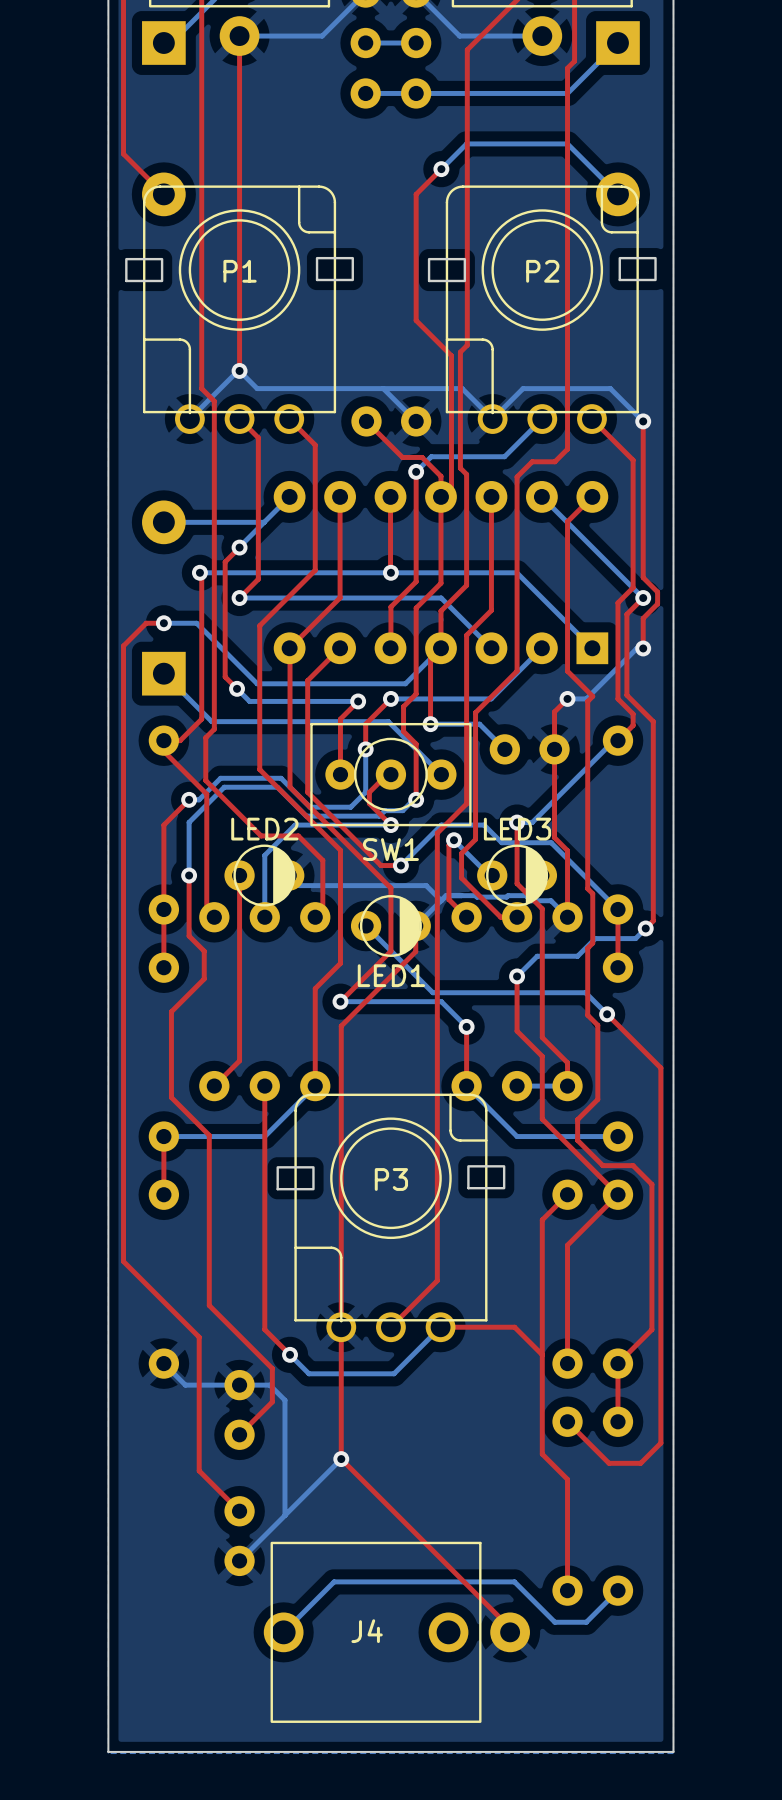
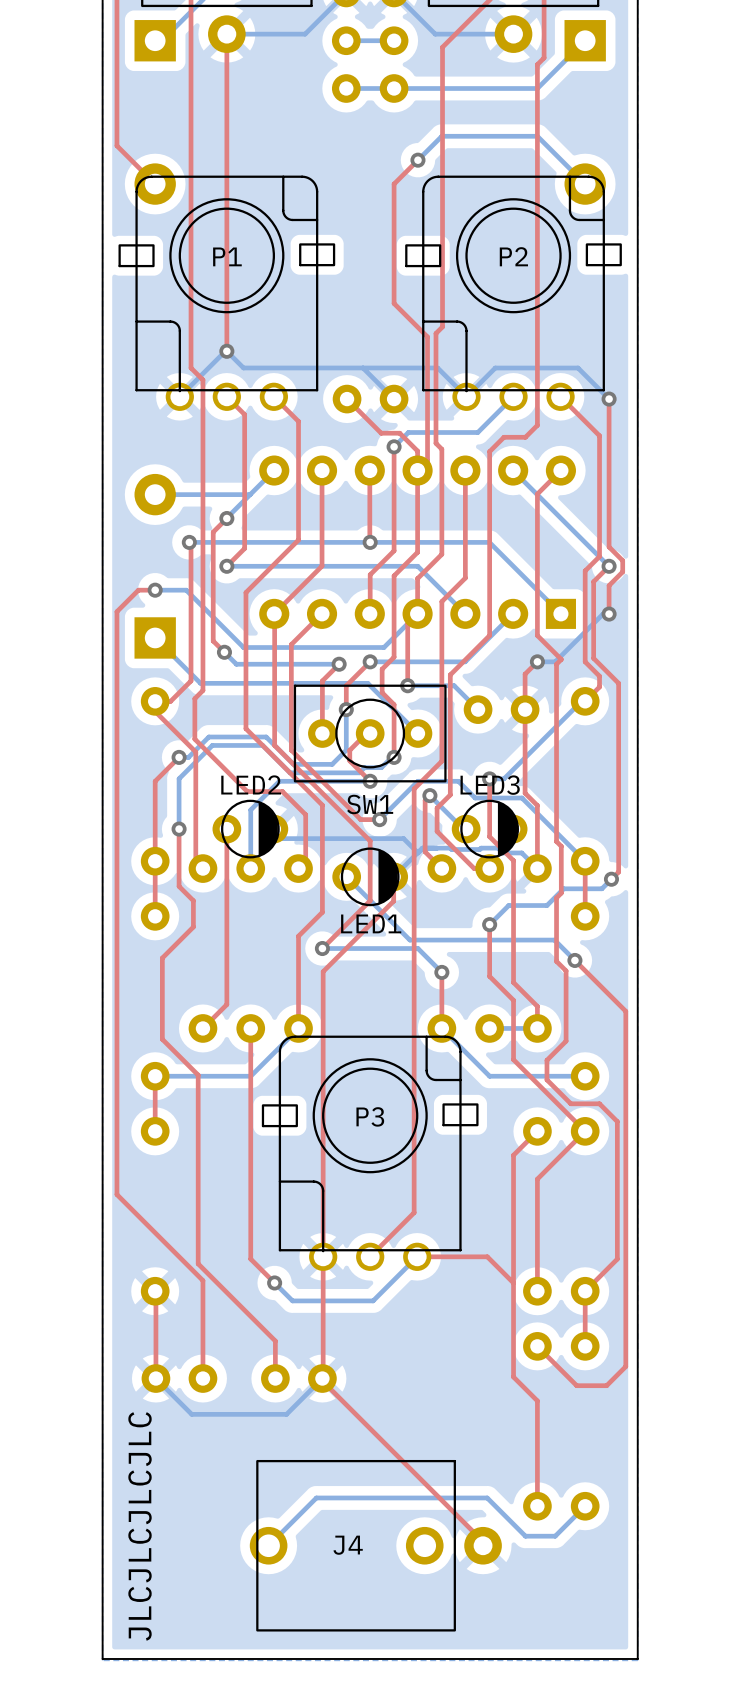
top track: (209, 1305) (272, 1368) (272, 1401) (239, 1434) -> (198, 1236) (198, 1263) (275, 1341) (275, 1378)
top track: (199, 1337) (199, 1470) (239, 1511) -> (188, 1266) (202, 1280) (202, 1378)
top track: none -> (155, 1291) (155, 1378)
bottom track: (163, 1363) (185, 1385) (269, 1385) (284, 1400) (284, 1515) (239, 1560) -> none
part: (239, 1409) -> none
bottom track: none -> (155, 1378) (191, 1414) (286, 1414) (322, 1378)
part: none -> (179, 1378)
part: none -> (298, 1378)
bottom track: (341, 1459) (284, 1515) -> none
via: (341, 1459) -> none
part: (239, 1536) -> none
text: none -> JLCJLCJLCJLC (140, 1526)

